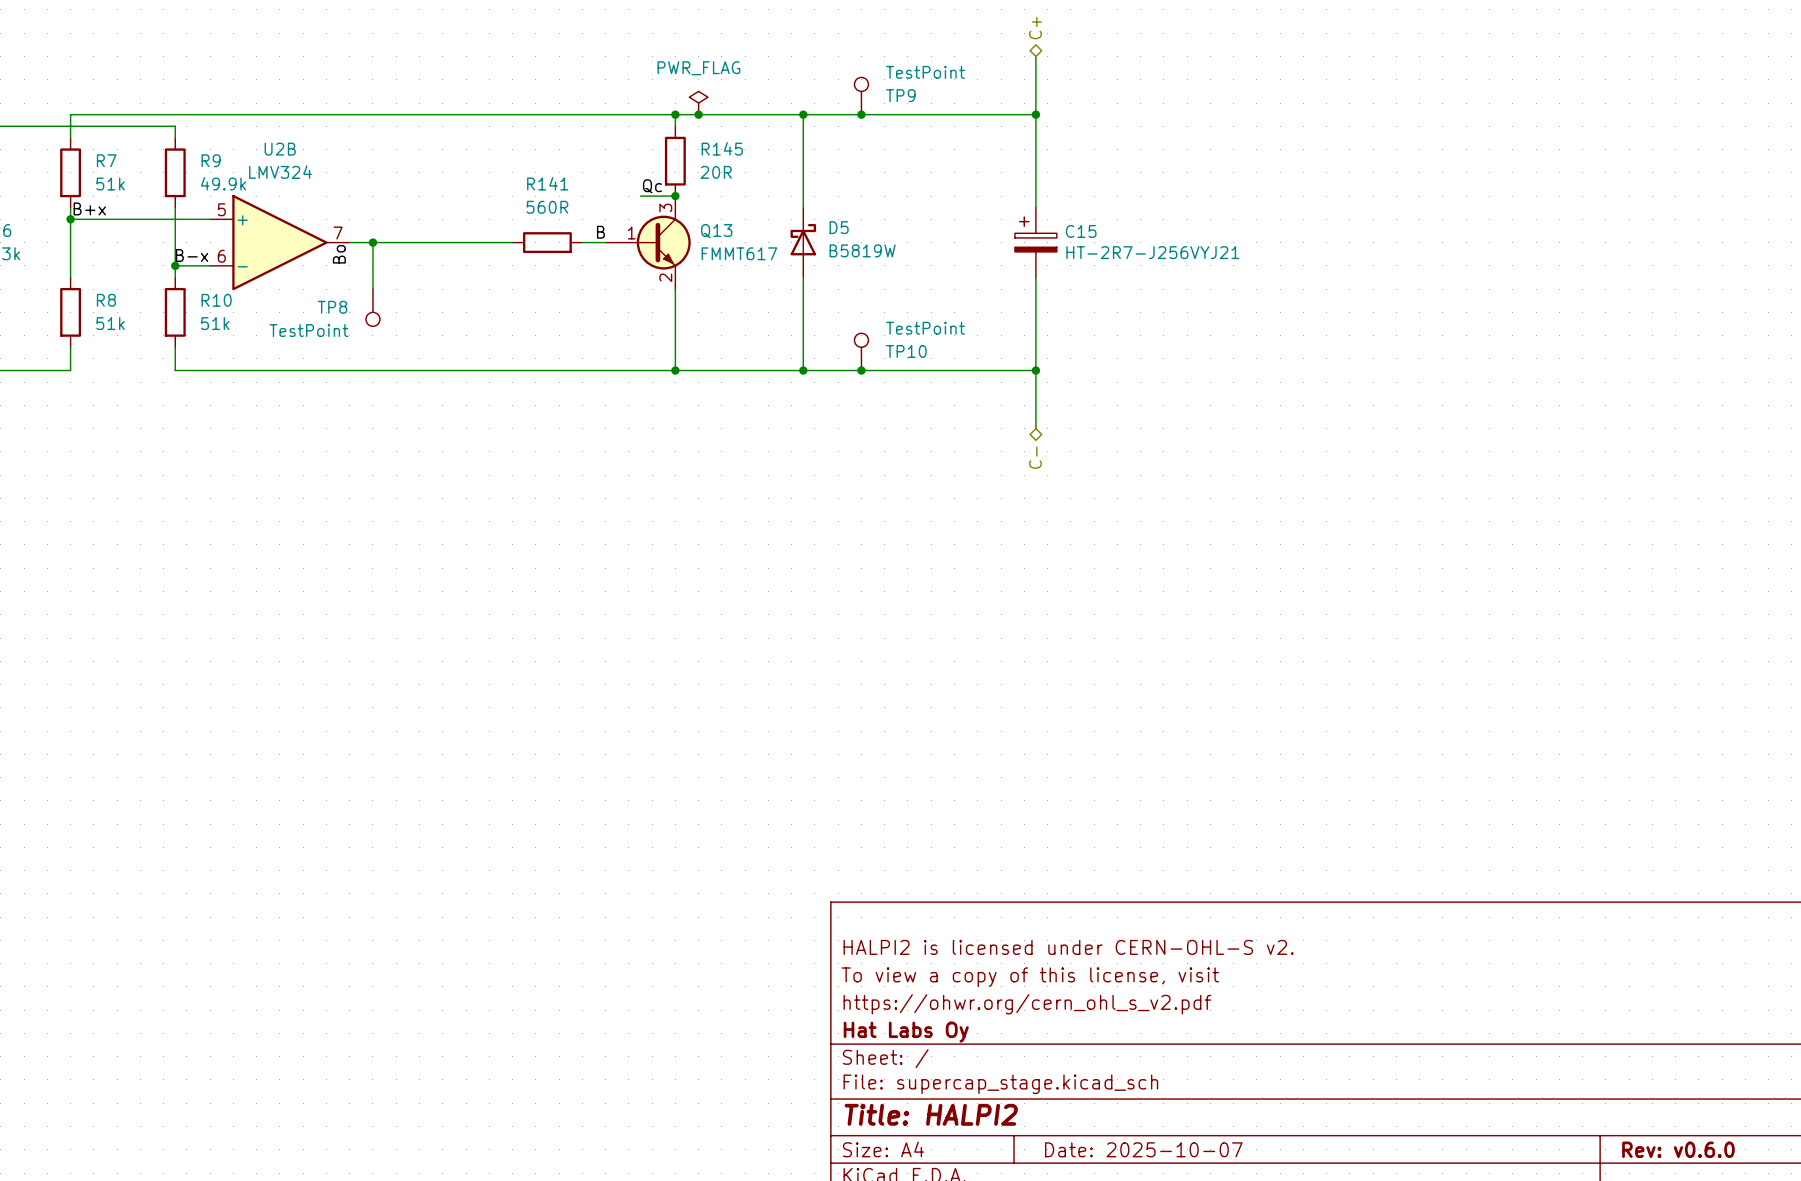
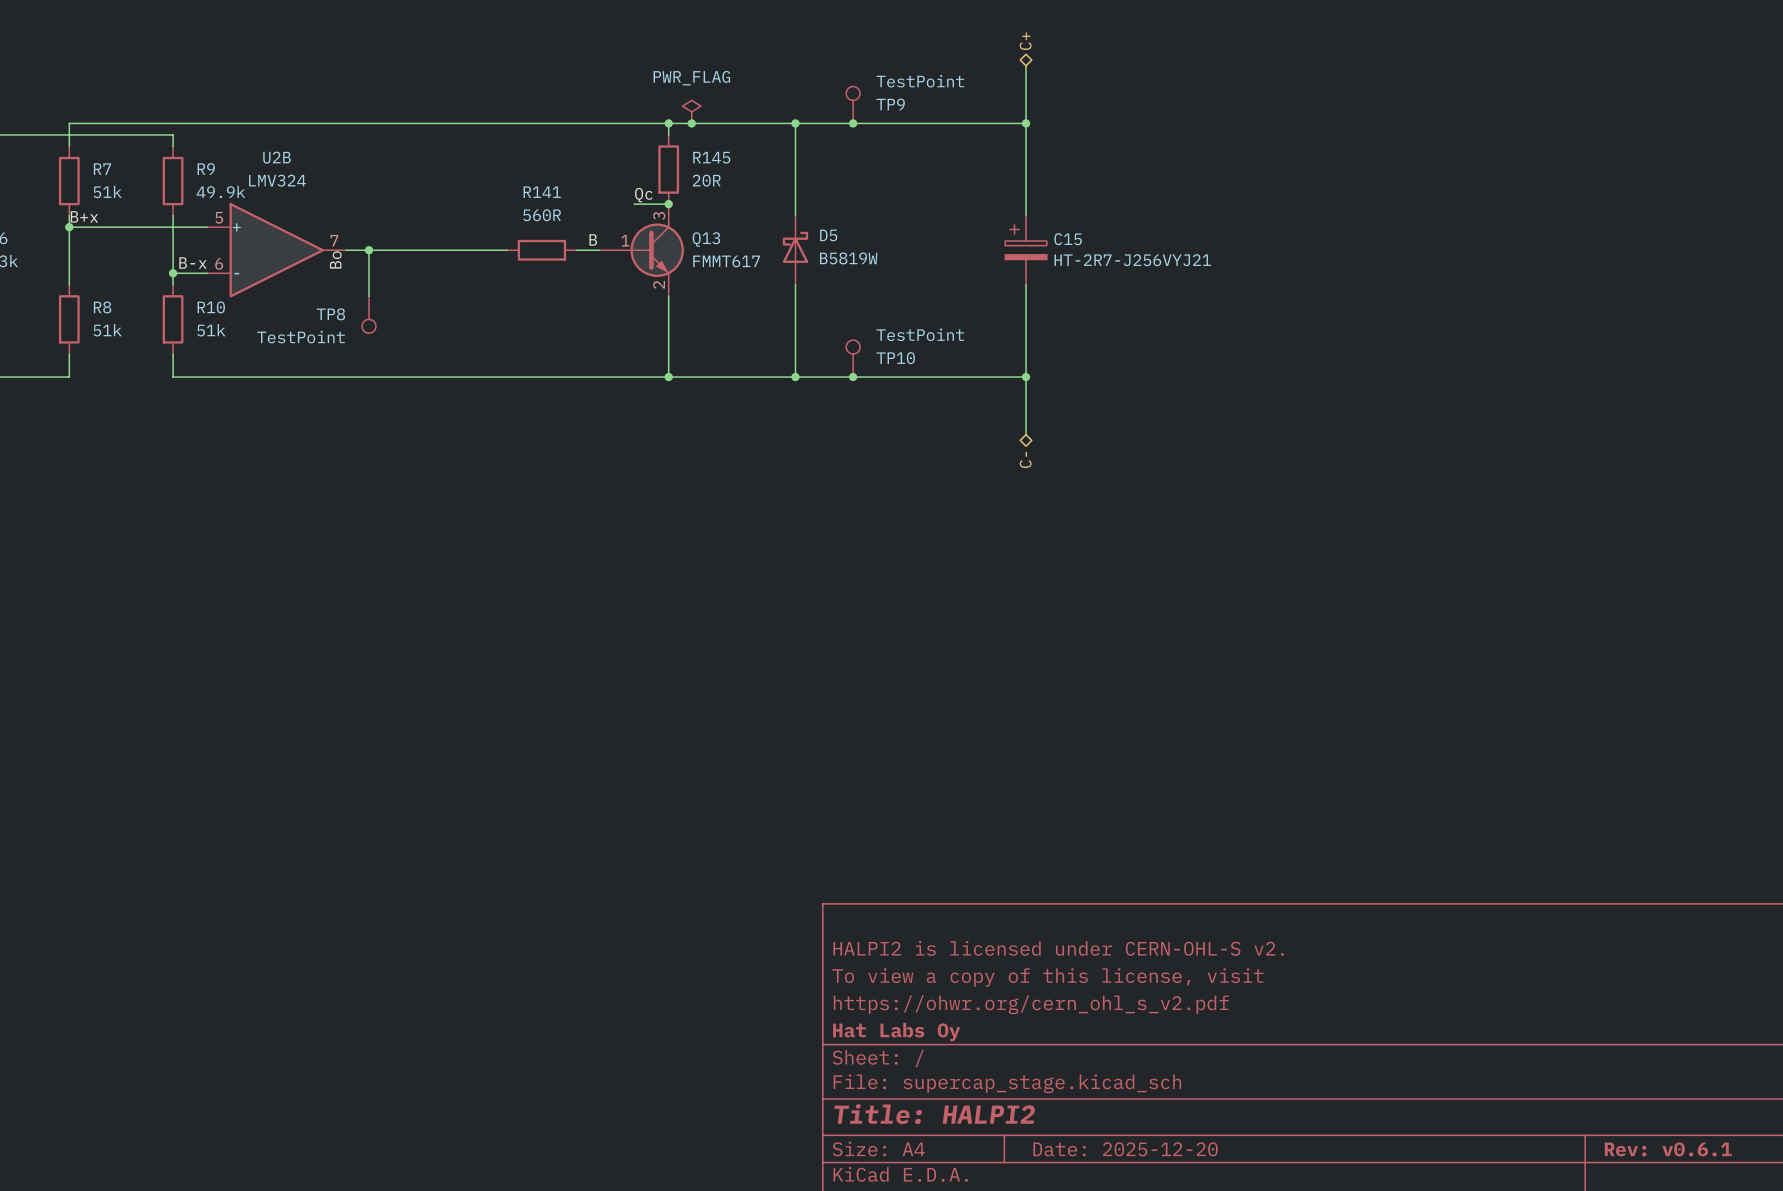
title block: Date: 2025-10-07 (1143, 1149) -> Date: 2025-12-20 (1125, 1149)
title block: Rev: v0.6.0 (1678, 1149) -> Rev: v0.6.1 (1668, 1149)

